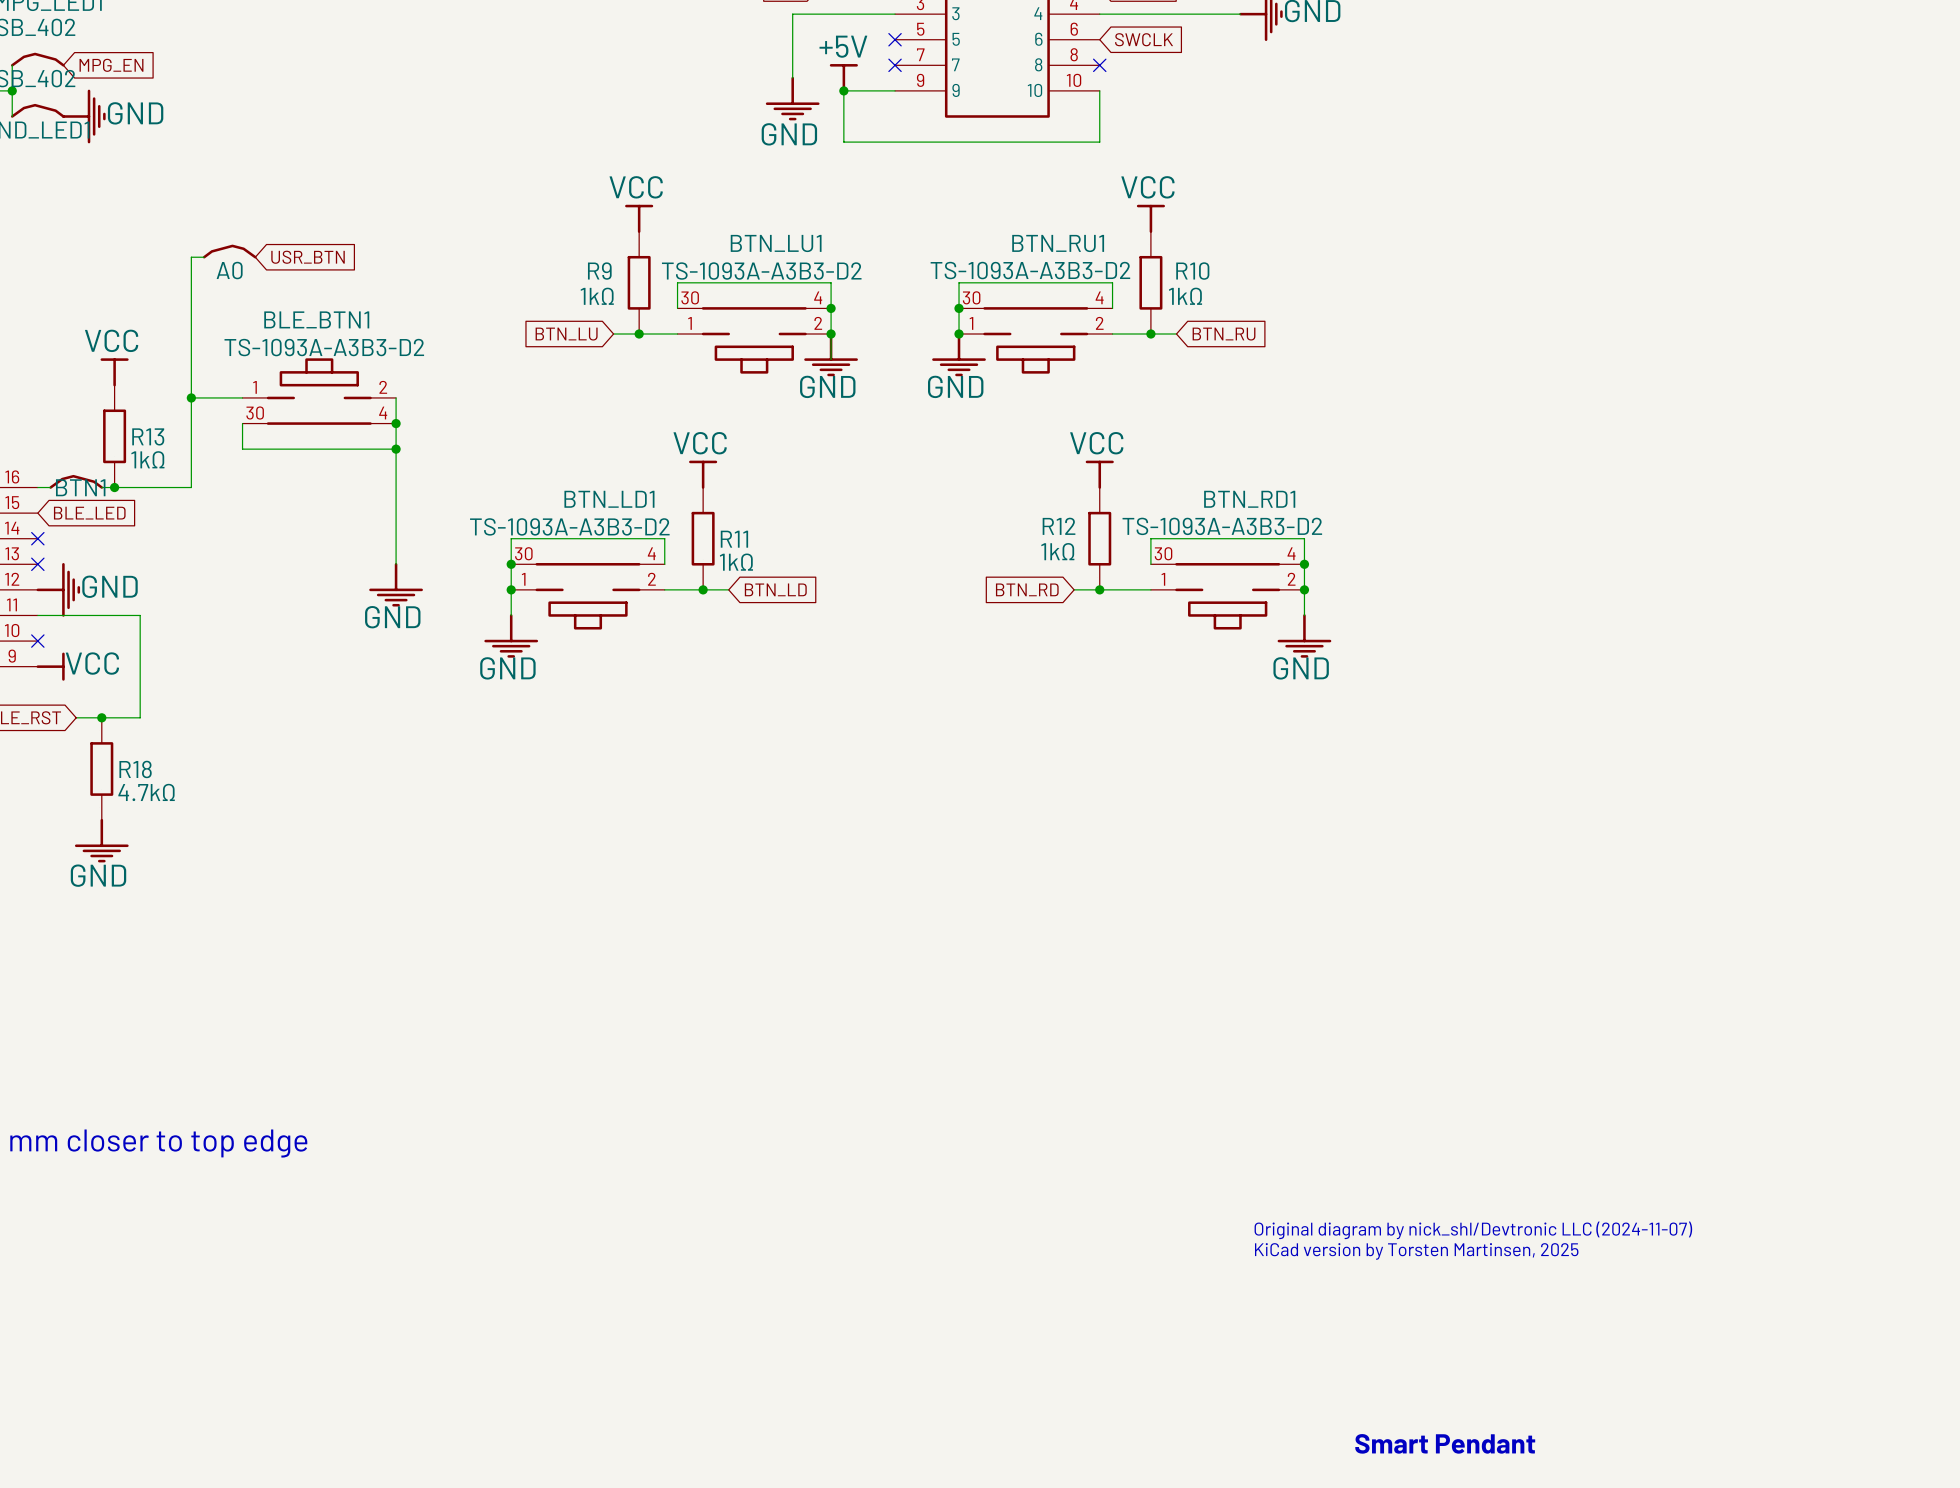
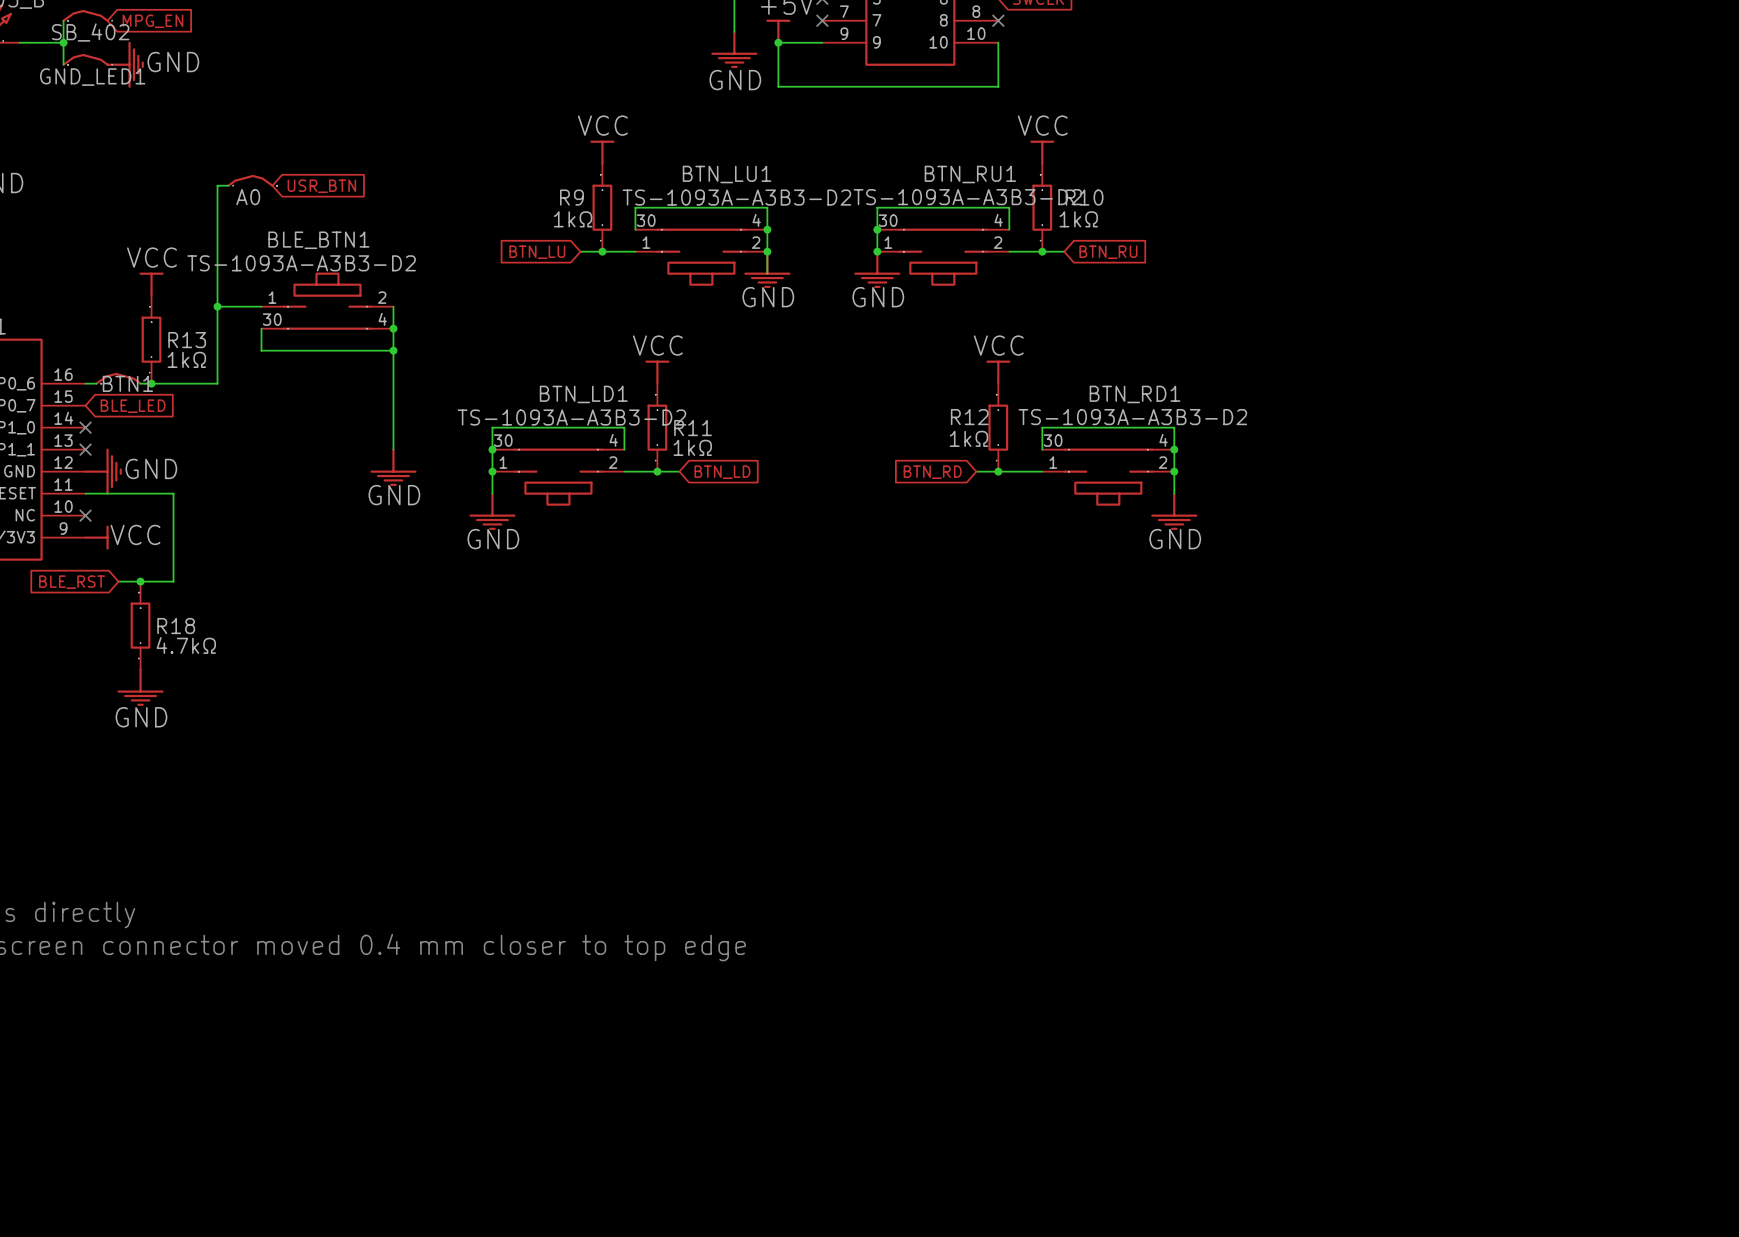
text: Original diagram by nick_shl/Devtronic LLC (2024-11-07) (1473, 1230) -> none
text: KiCad version by Torsten Martinsen, 2025 (1416, 1251) -> none
text: Smart Pendant (1445, 1443) -> none

